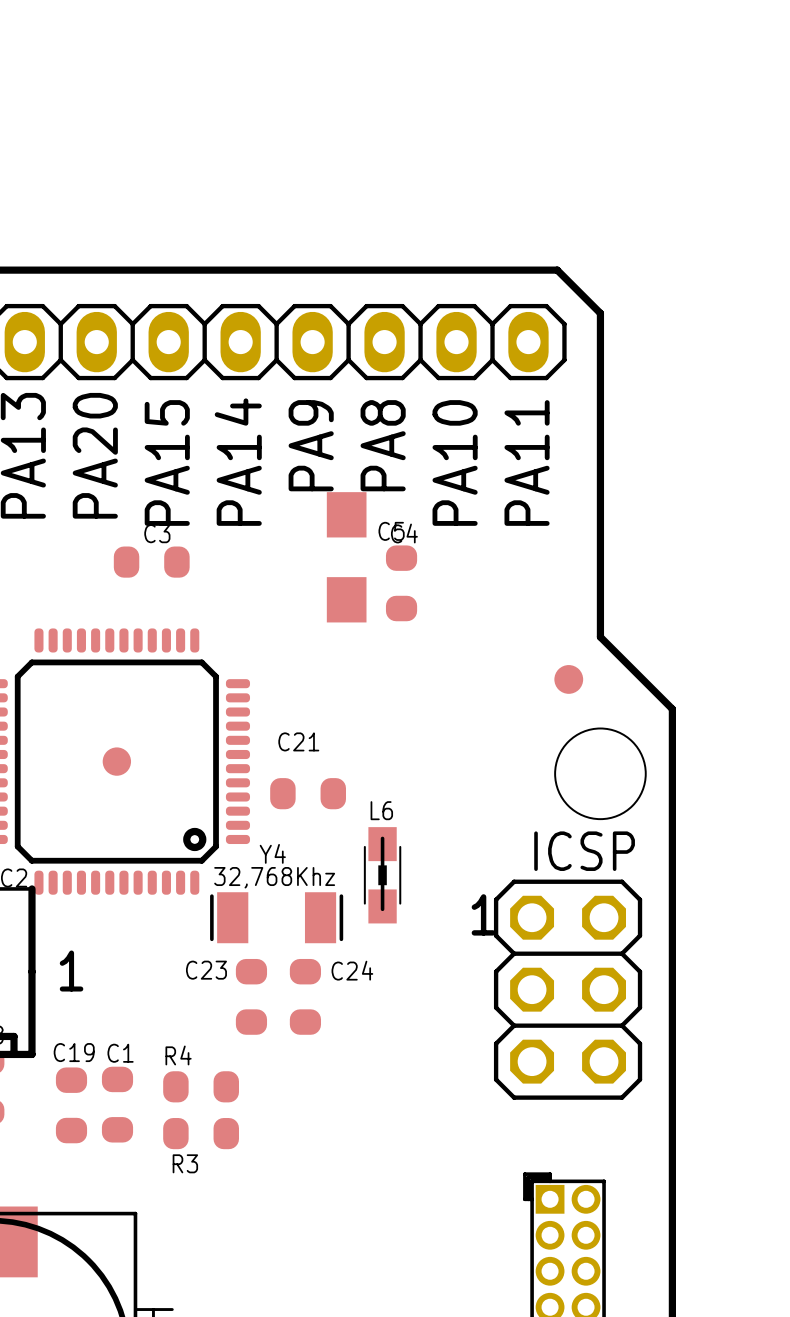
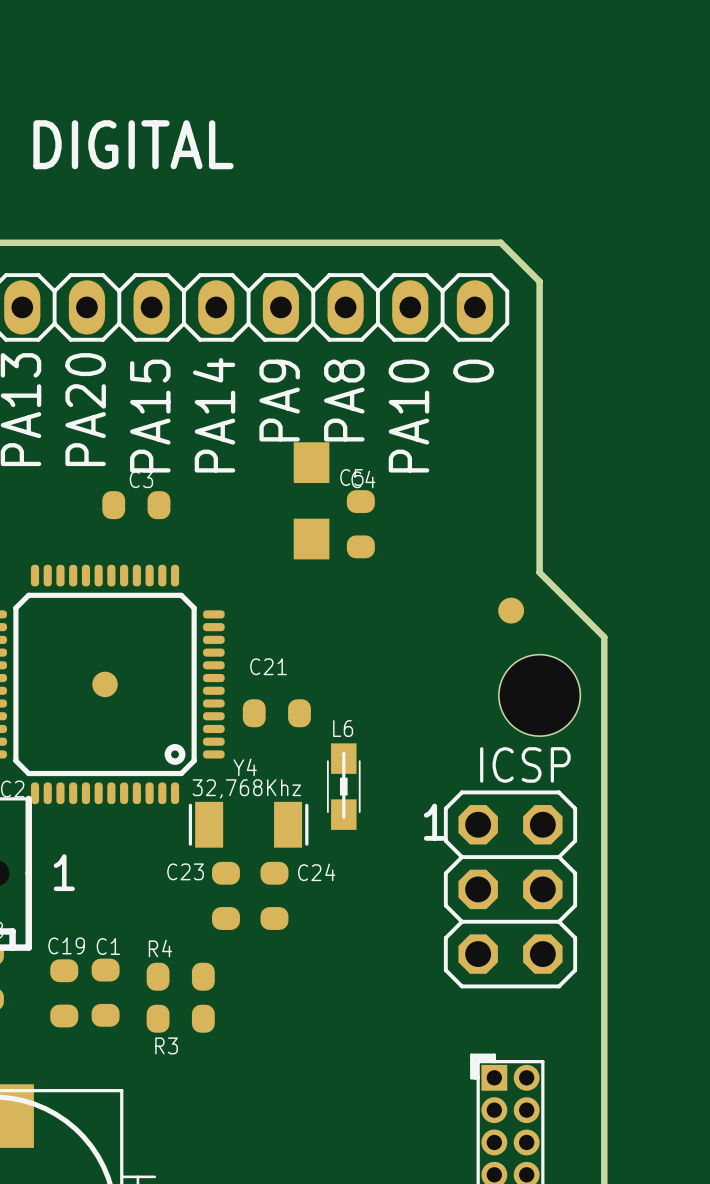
text: none -> DIGITAL (133, 144)
text: PA11 (527, 462) -> 0 (473, 371)

